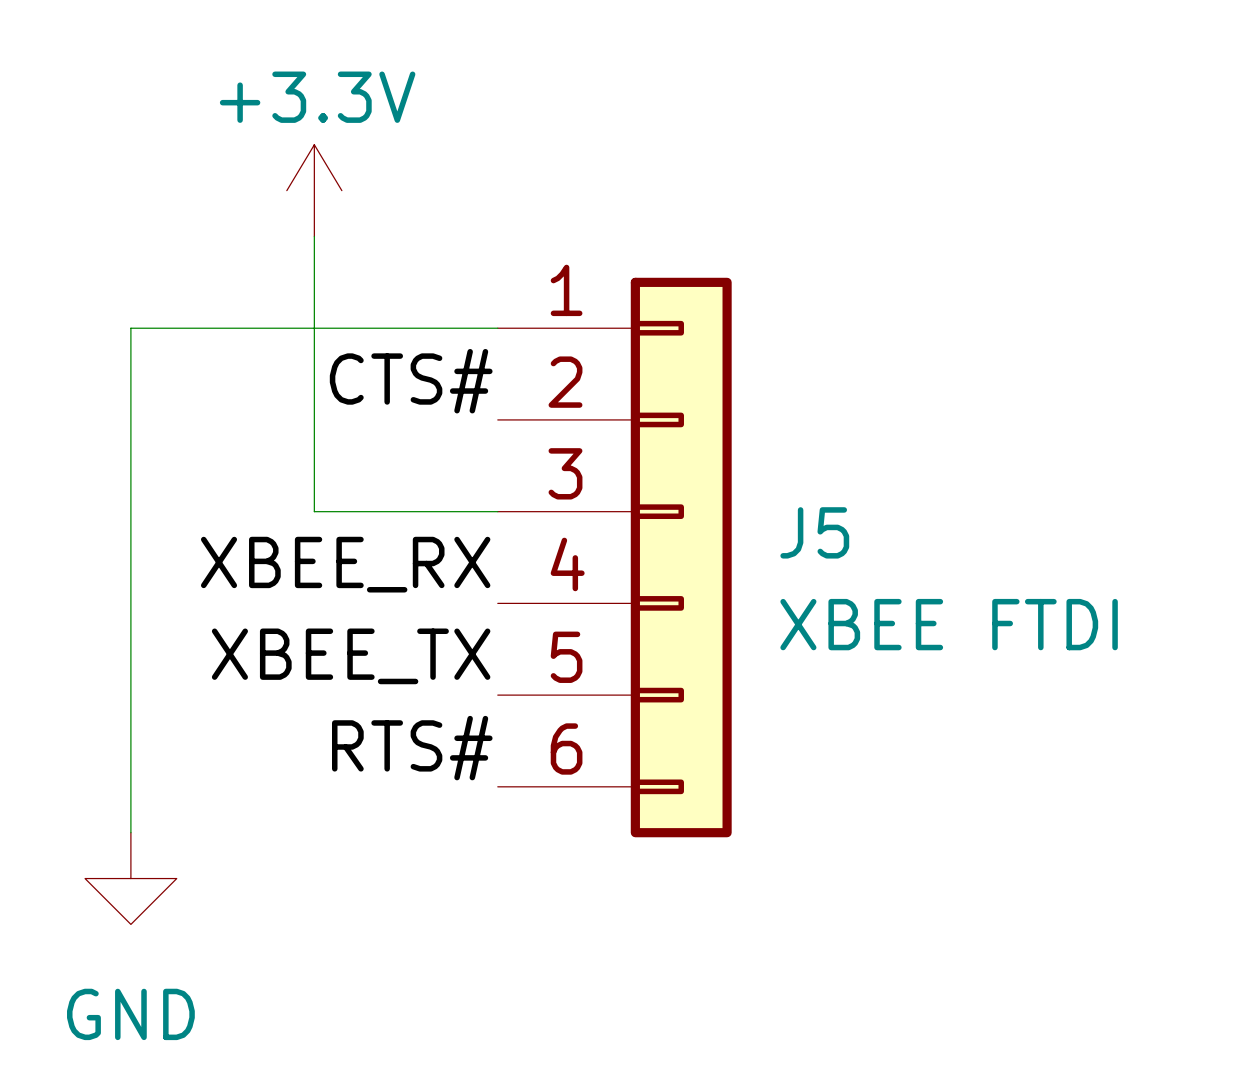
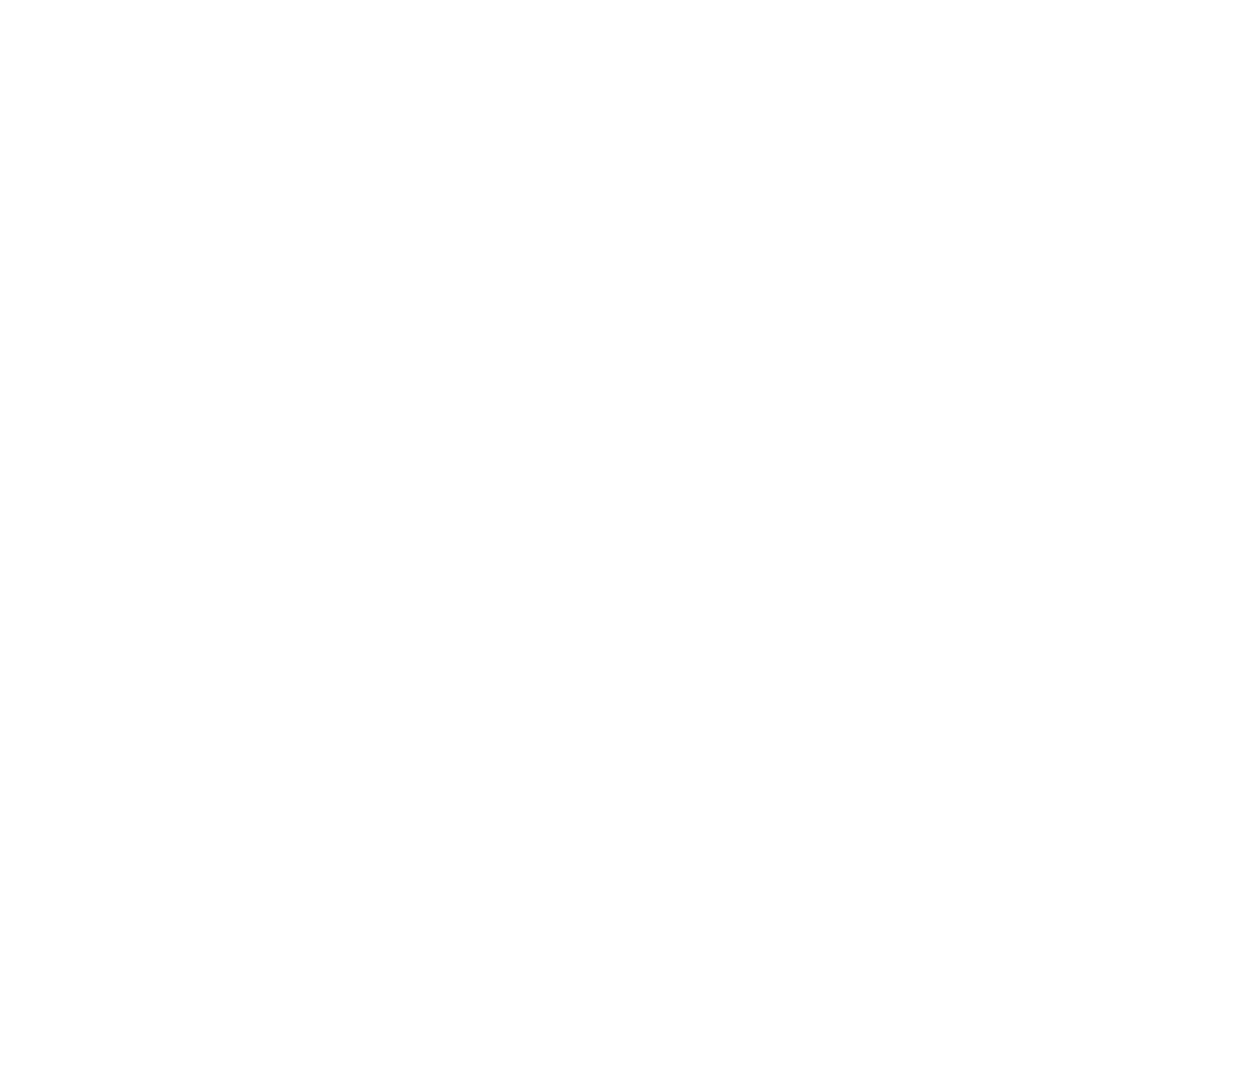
power symbol: +3.3V (314, 190) -> none
wire: (314, 236) (314, 511) (497, 511) -> none
wire: (497, 328) (130, 328) (130, 832) -> none
label: CTS# (411, 381) -> none
J5: XBEE FTDI (614, 557) -> none
label: XBEE_RX (345, 564) -> none
label: XBEE_TX (351, 656) -> none
label: RTS# (412, 748) -> none
power symbol: GND (130, 878) -> none

